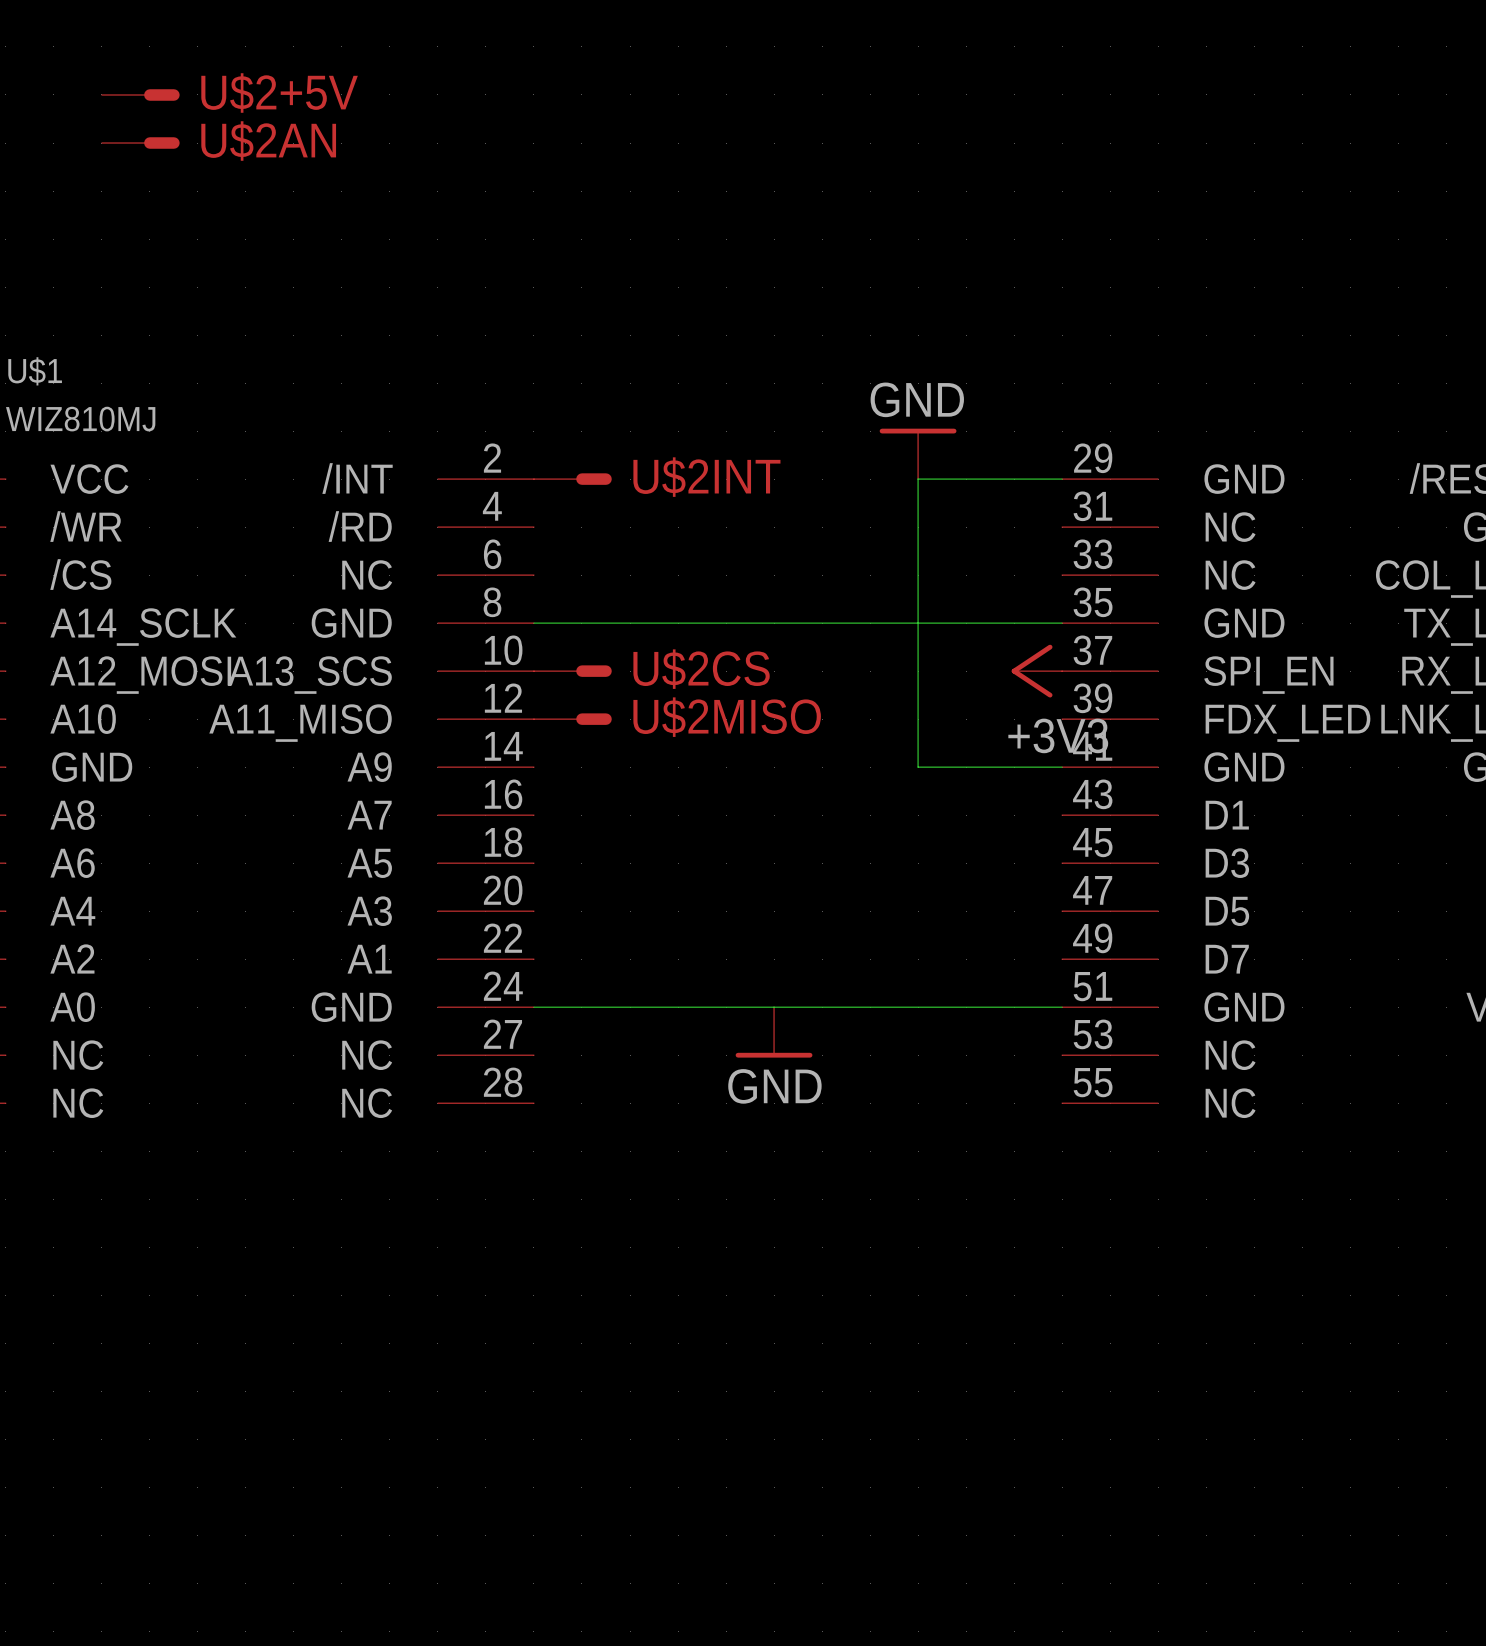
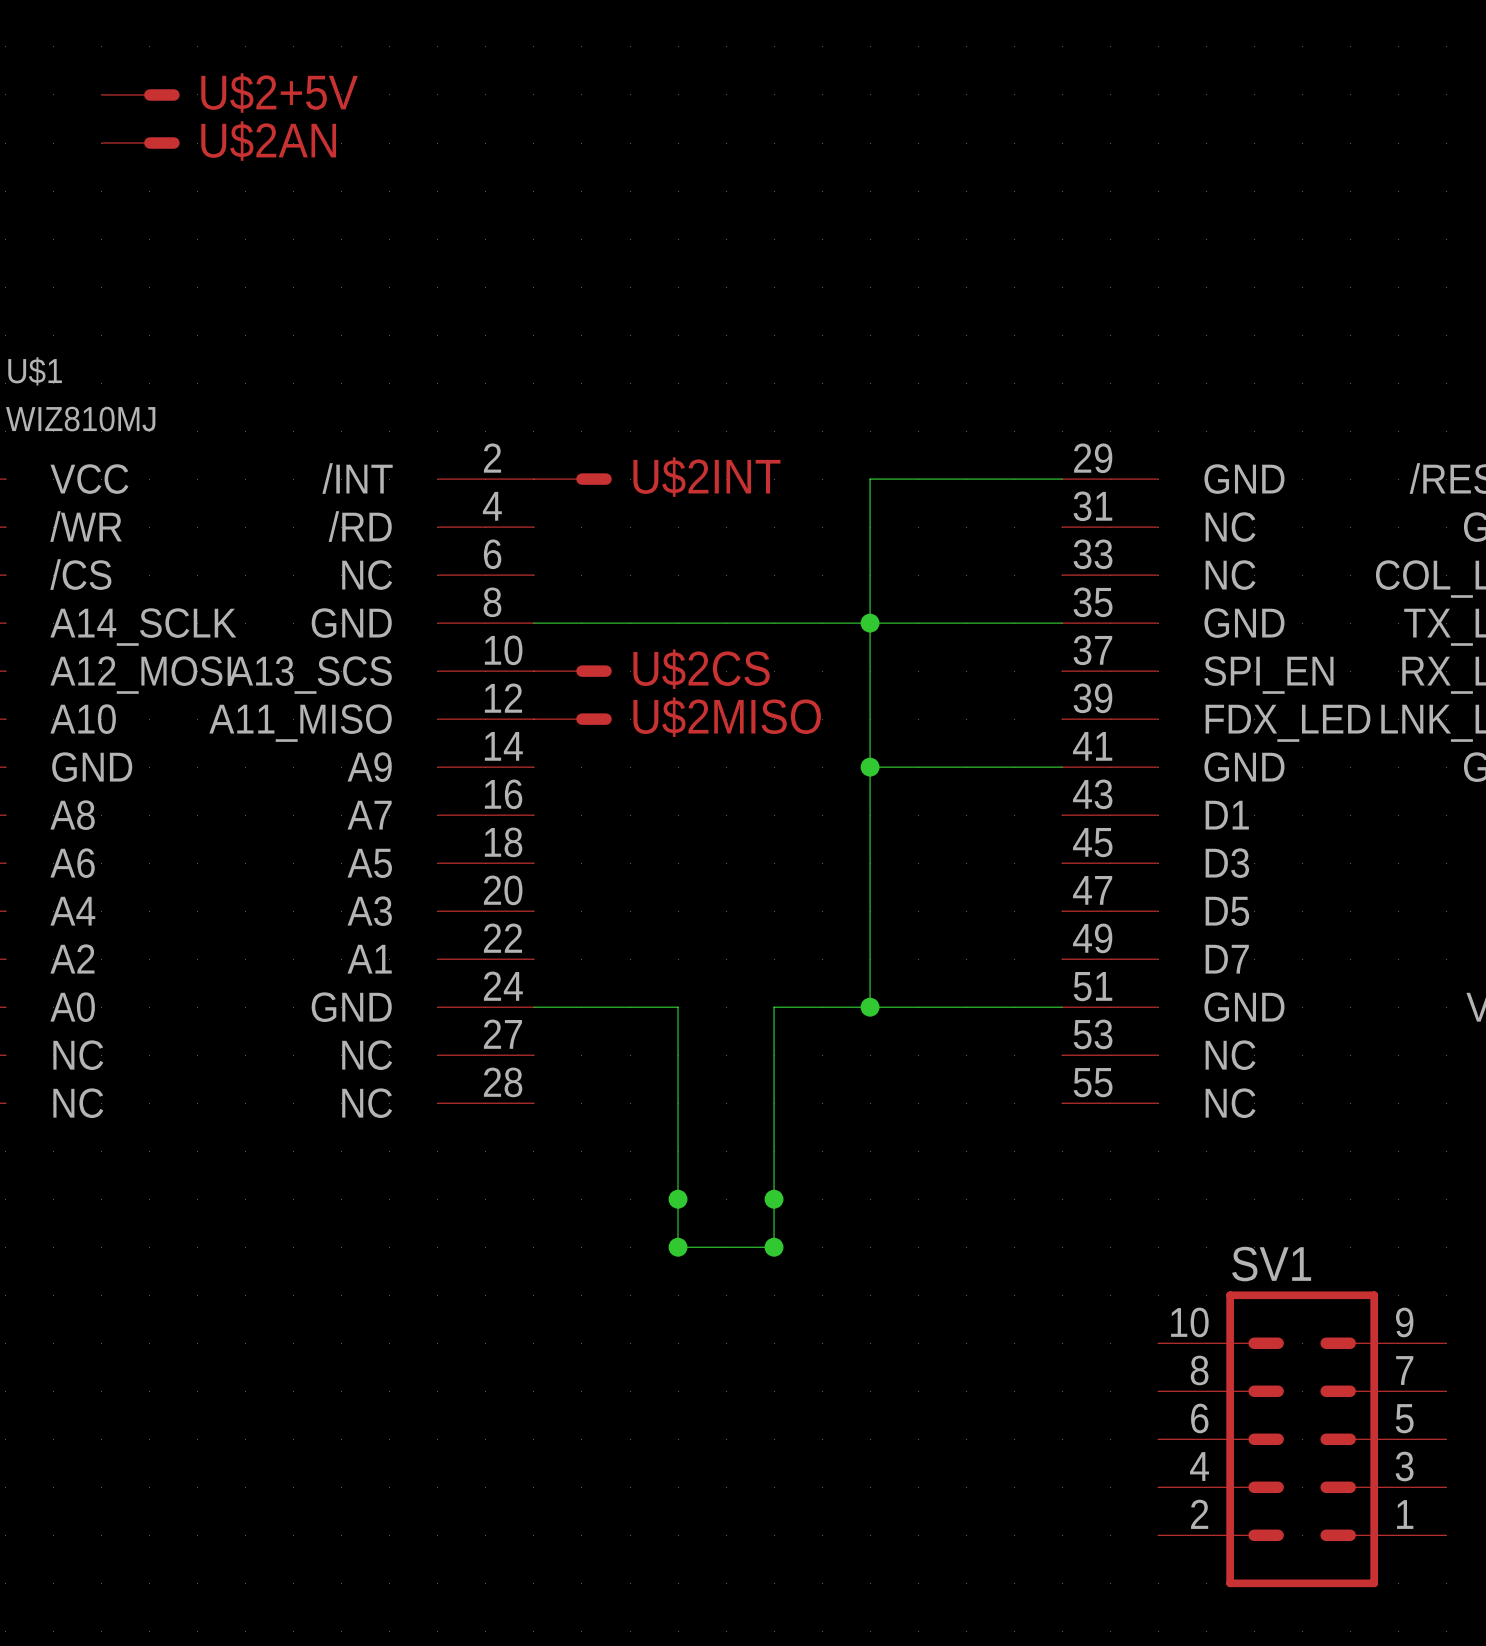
power symbol: GND (918, 453) -> none
wire: (918, 479) (918, 767) -> (918, 479) (870, 479) (870, 1007)
junction: none -> (870, 623)
power symbol: +3V3 (1036, 671) -> none
wire: none -> (870, 767) (918, 767)
junction: none -> (870, 767)
wire: (678, 1007) (774, 1007) -> (678, 1007) (678, 1247) (774, 1247) (774, 1007)
junction: none -> (870, 1007)
power symbol: GND (774, 1032) -> none
junction: none -> (678, 1199)
junction: none -> (774, 1199)
junction: none -> (678, 1247)
junction: none -> (774, 1247)
SV1: none -> (1302, 1439)

